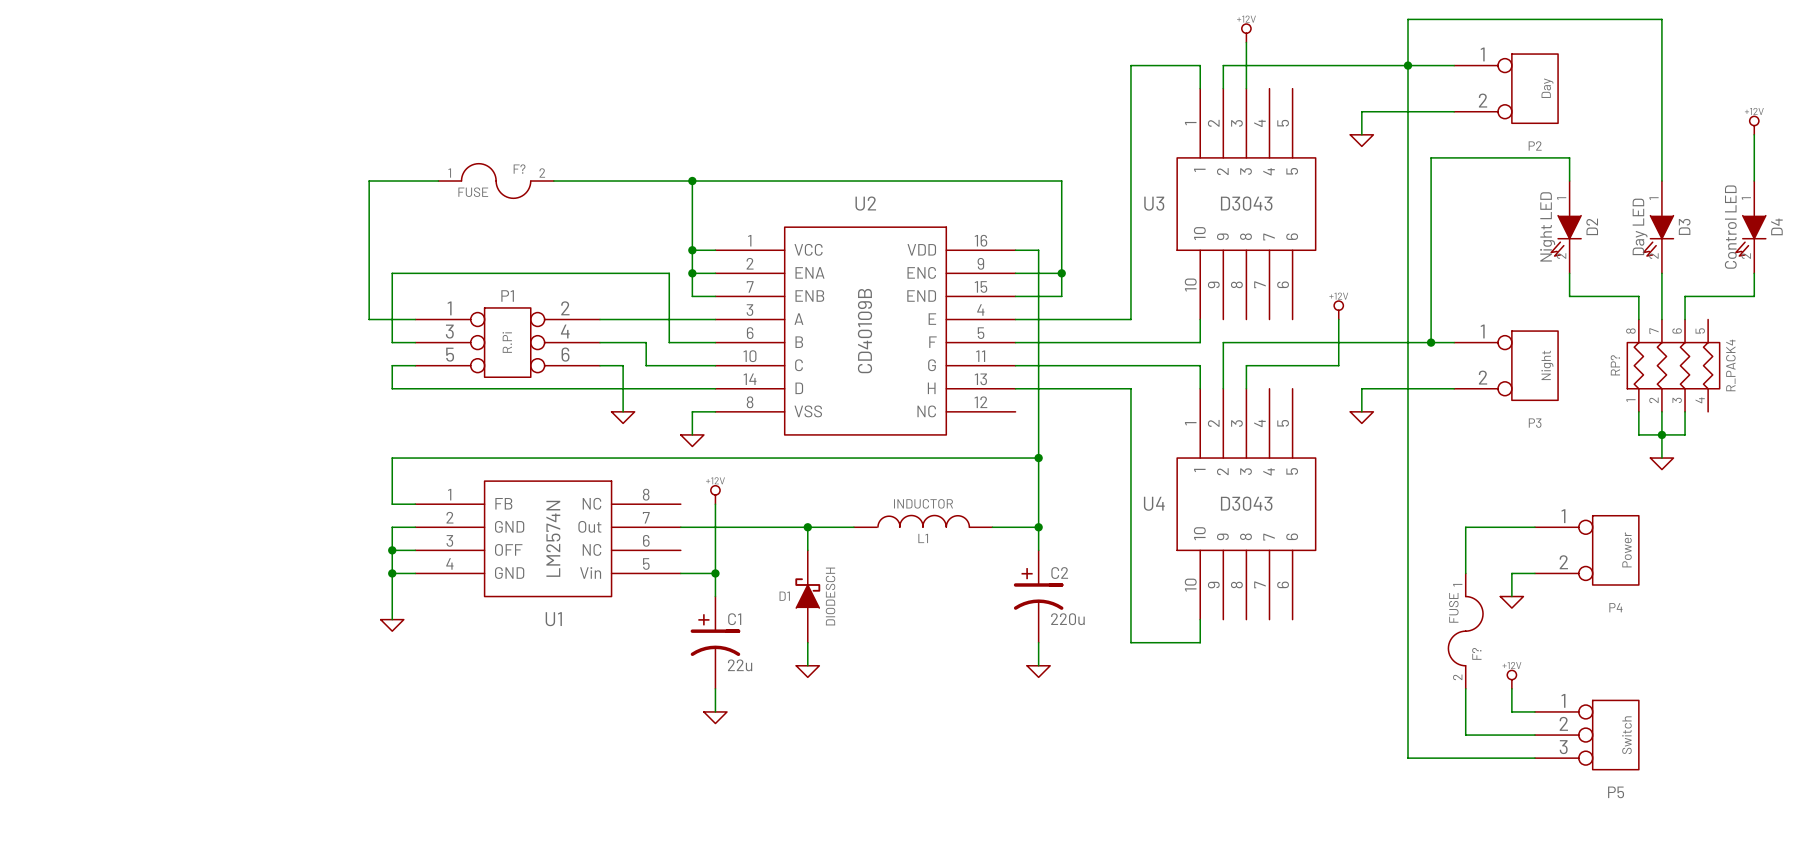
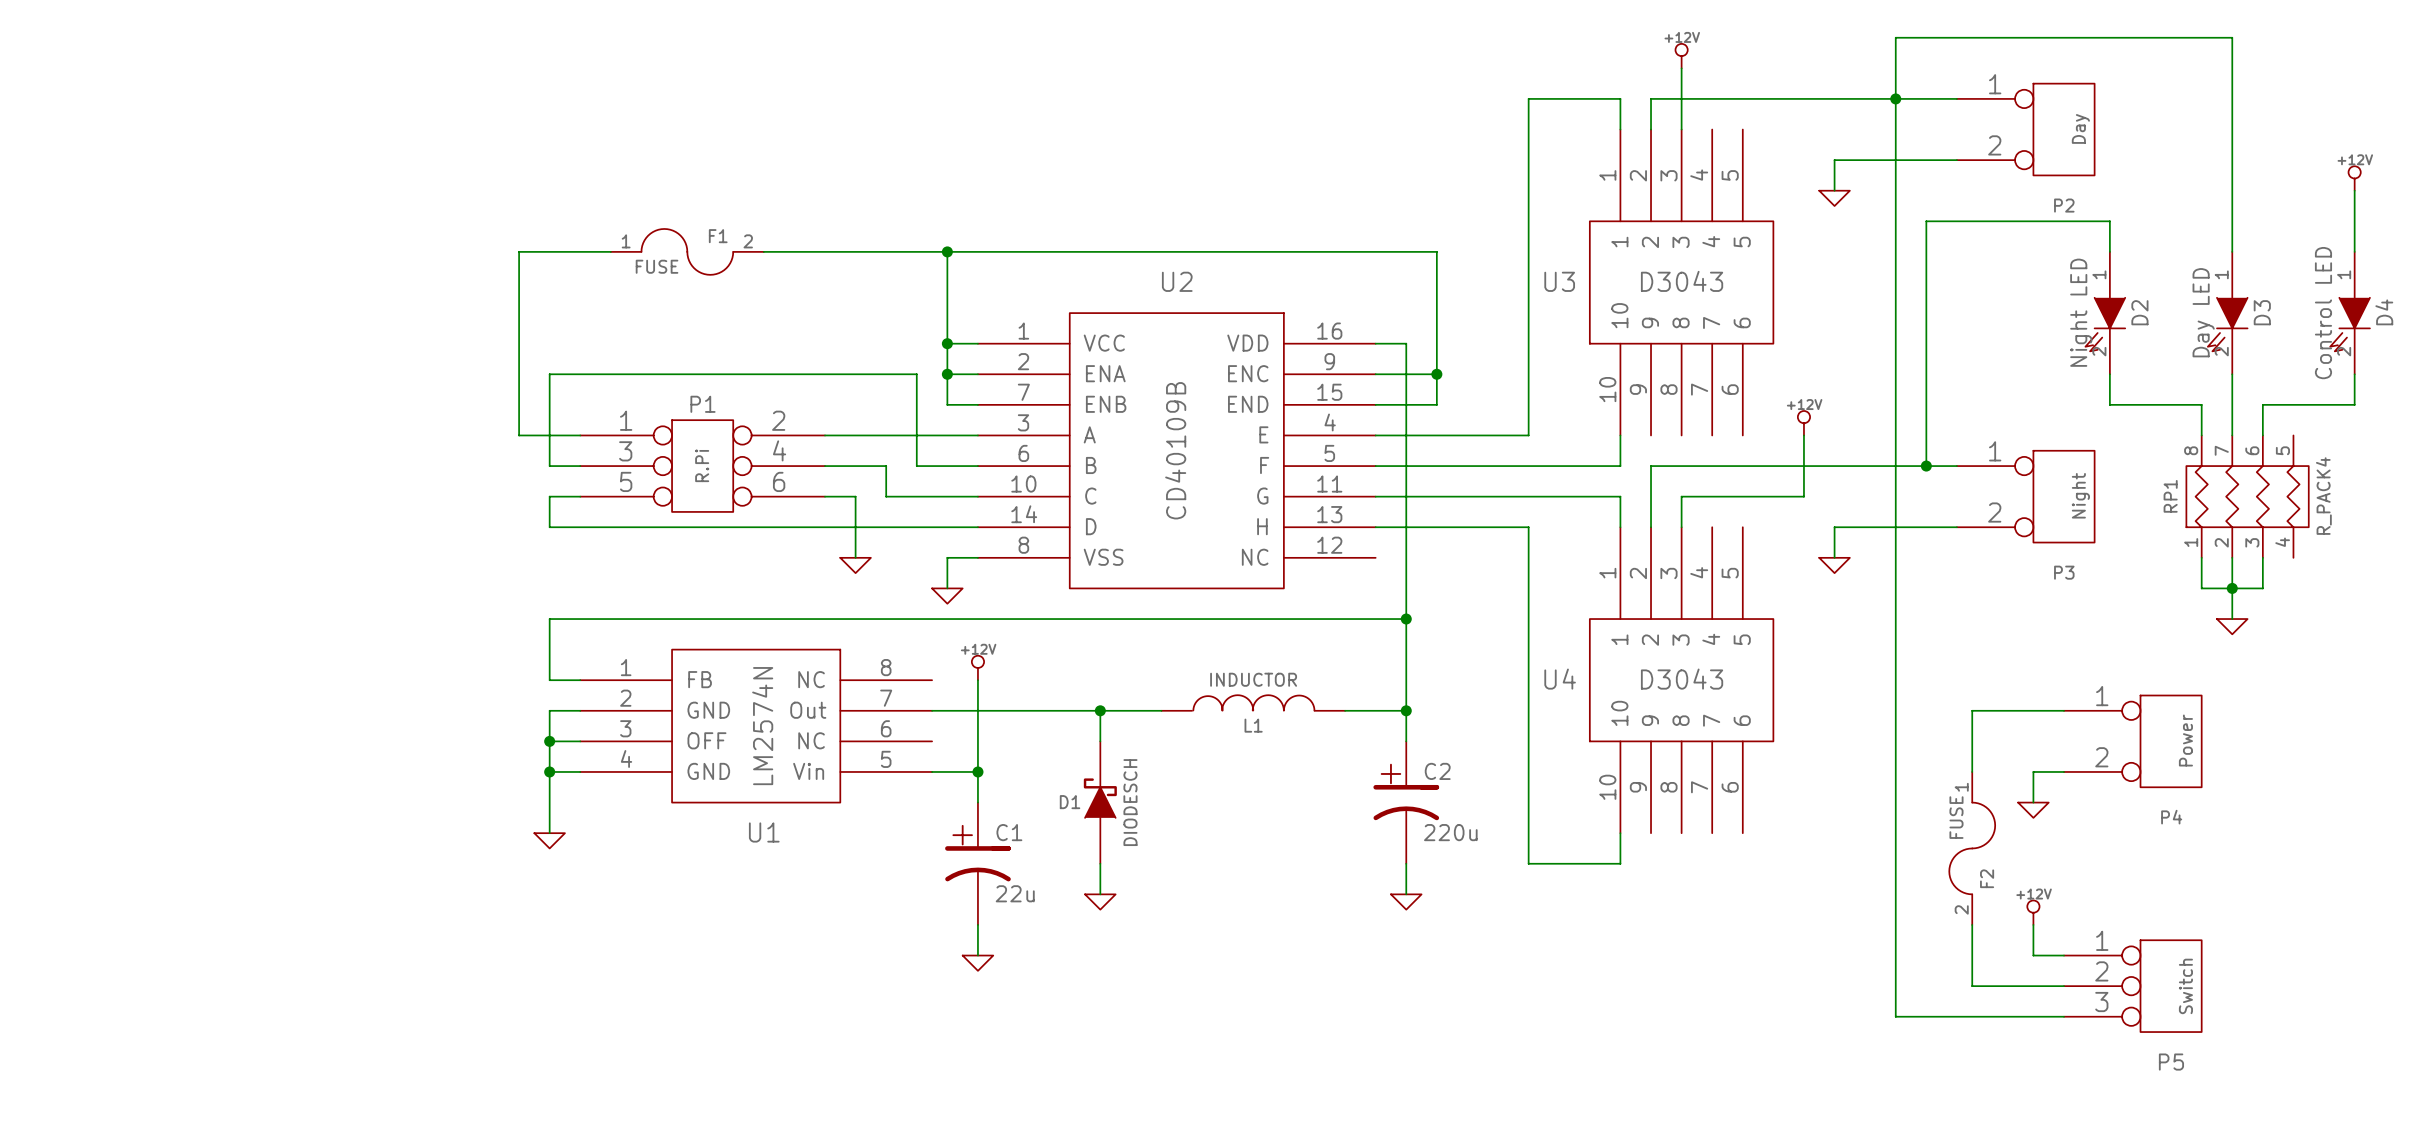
F? name: F? (519, 169) -> F1 (718, 236)
RP? name: RP? (1615, 365) -> RP1 (2170, 496)
F? name: F? (1476, 653) -> F2 (1987, 878)

